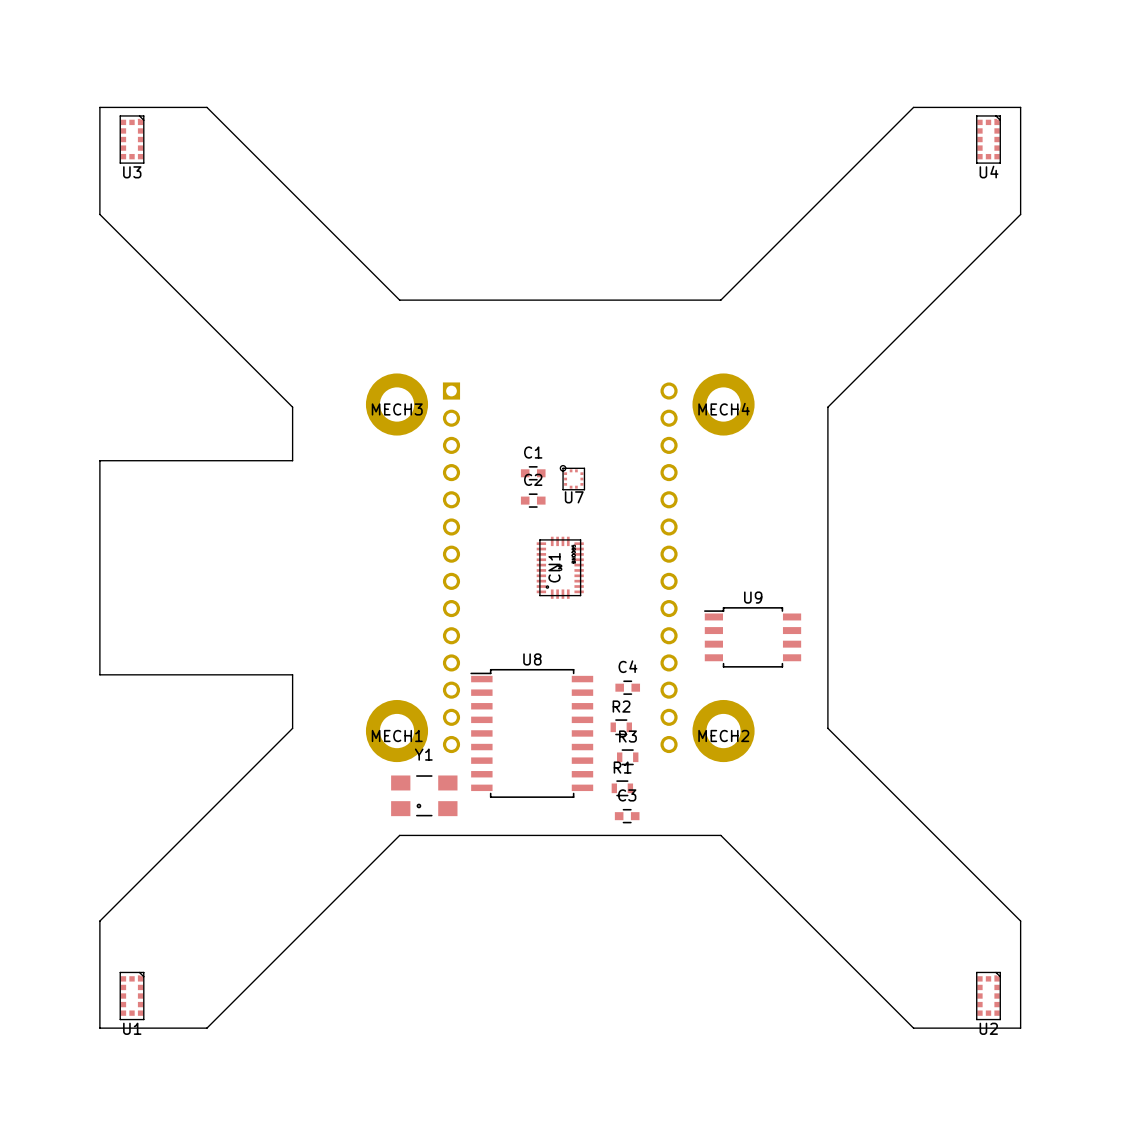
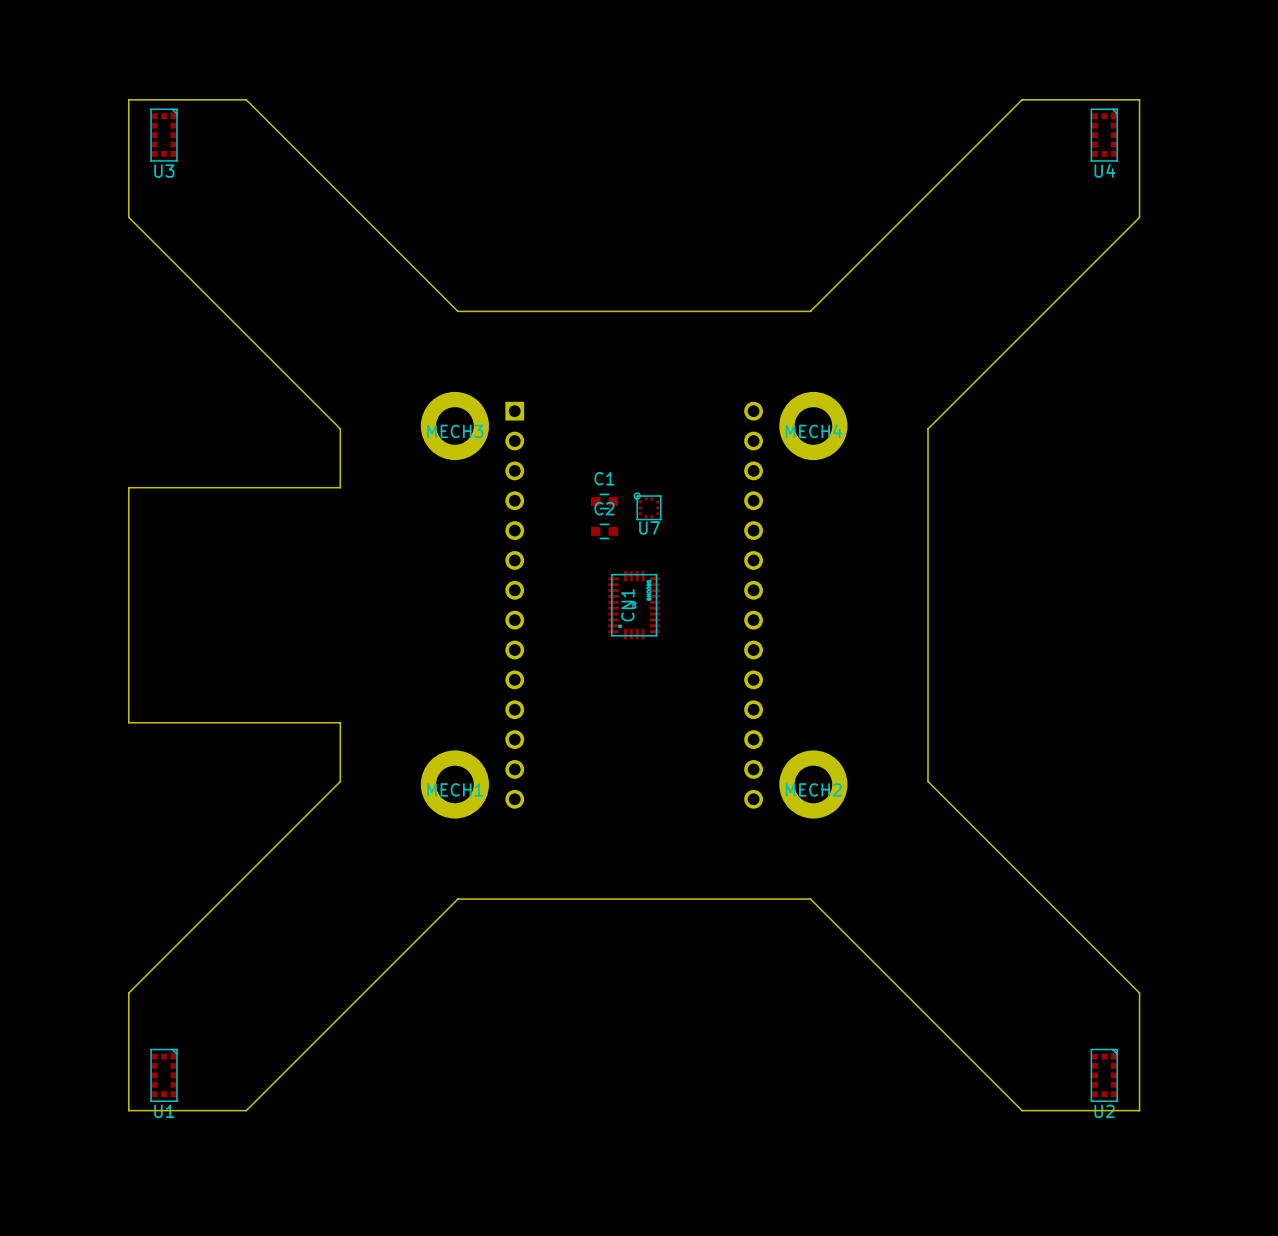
U9: (752, 637) -> none
C4: (627, 687) -> none
R2: (621, 727) -> none
U8: (531, 733) -> none
R3: (627, 757) -> none
R1: (622, 788) -> none
Y1: (424, 795) -> none
C3: (627, 816) -> none

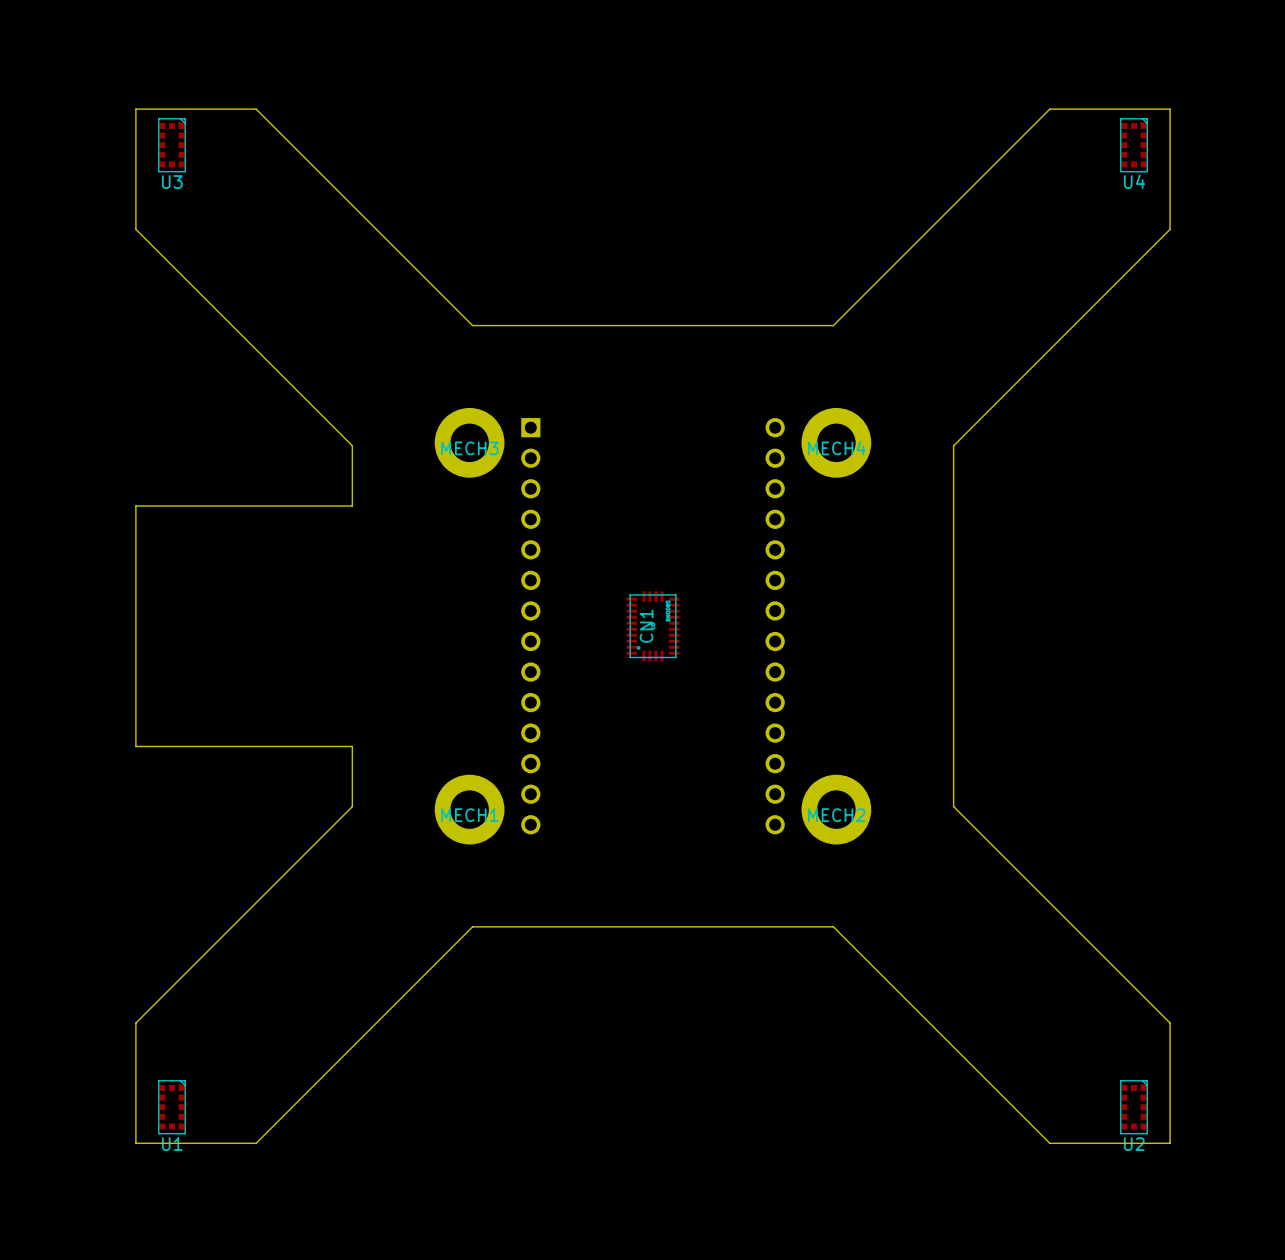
C1: (604, 501) -> none
U7: (647, 506) -> none
C2: (604, 531) -> none

